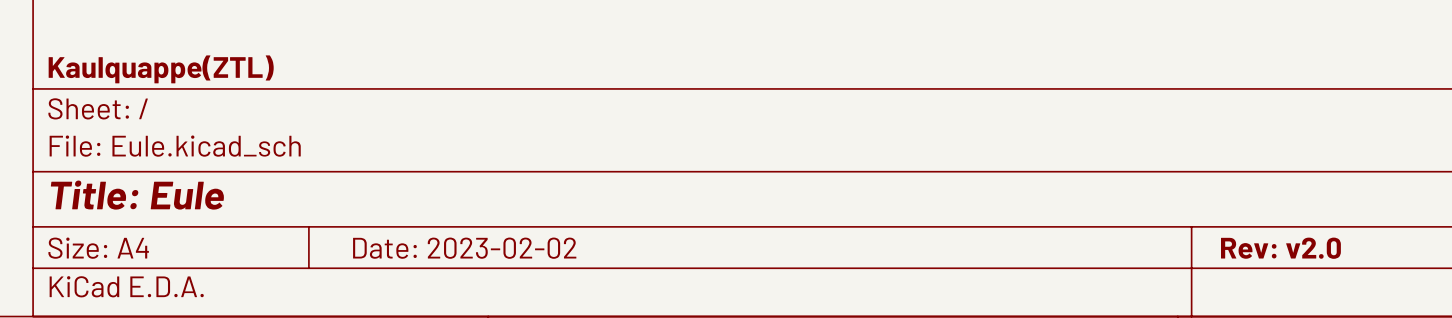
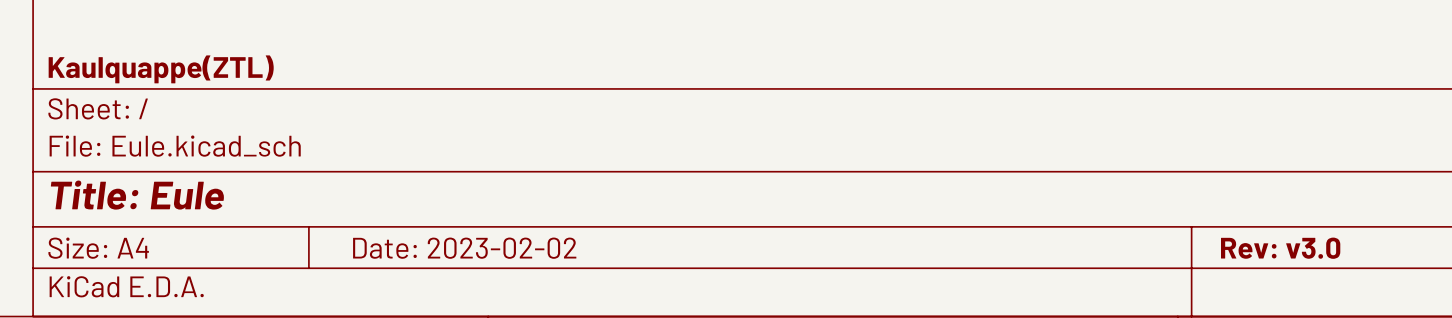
title block: Rev: v2.0 (1280, 248) -> Rev: v3.0 (1280, 248)

